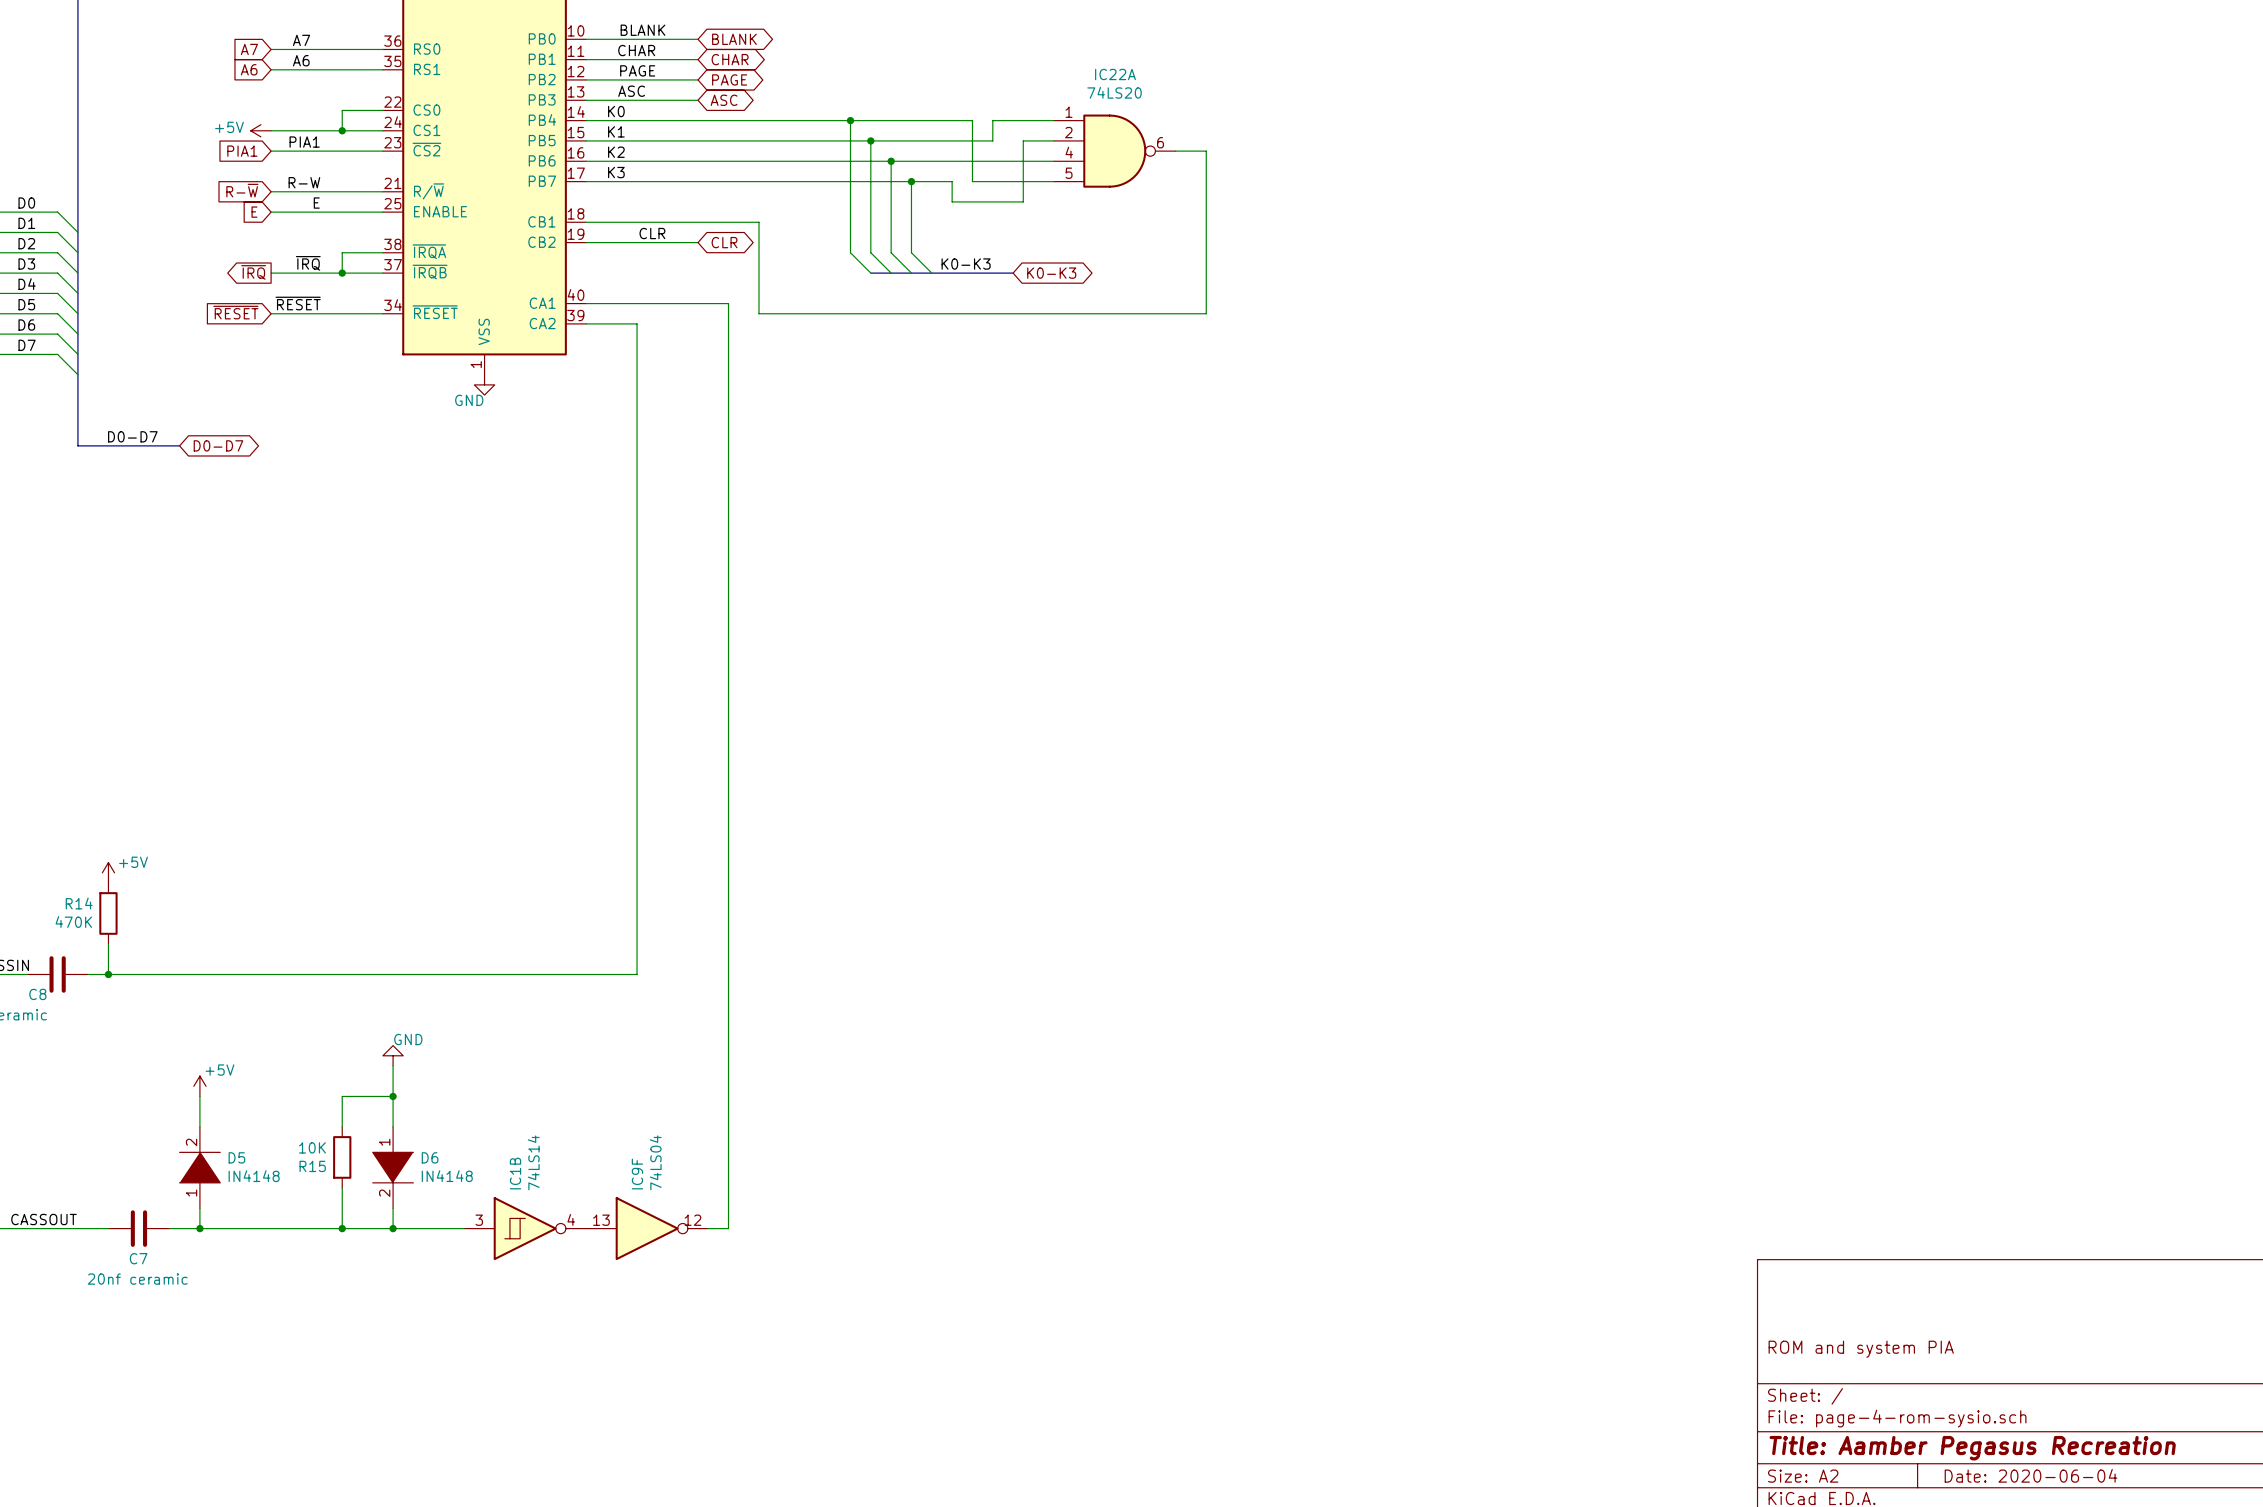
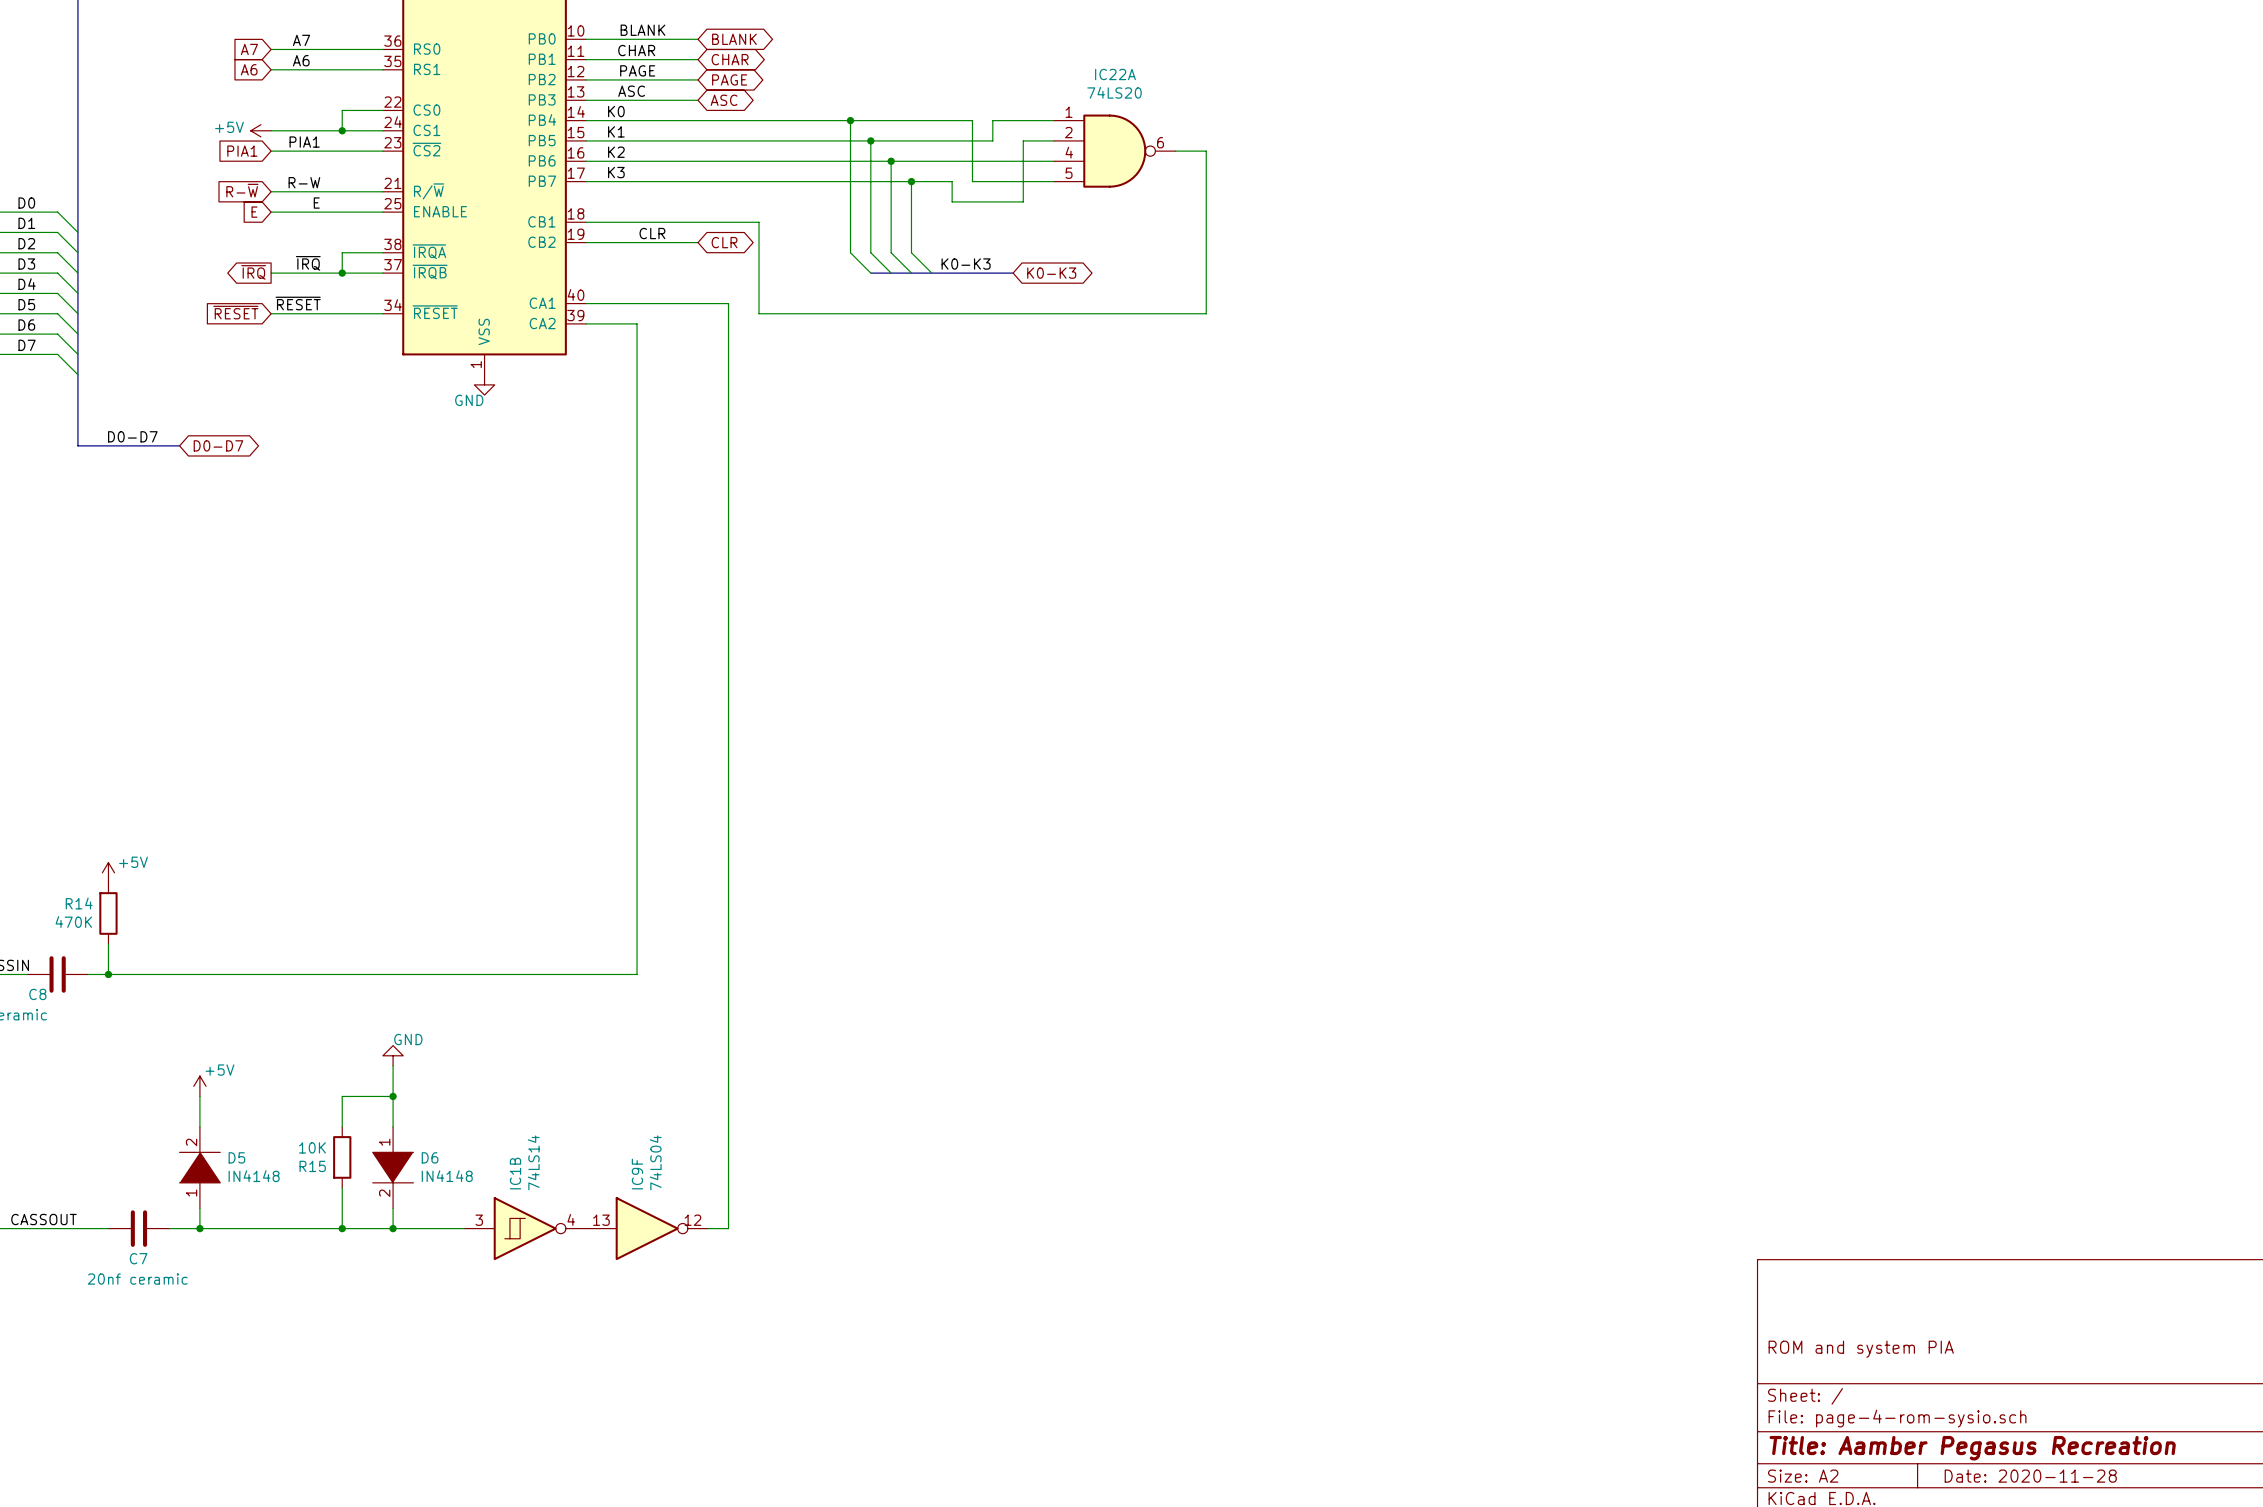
title block: Date: 2020-06-04 (2031, 1475) -> Date: 2020-11-28 (2030, 1476)

